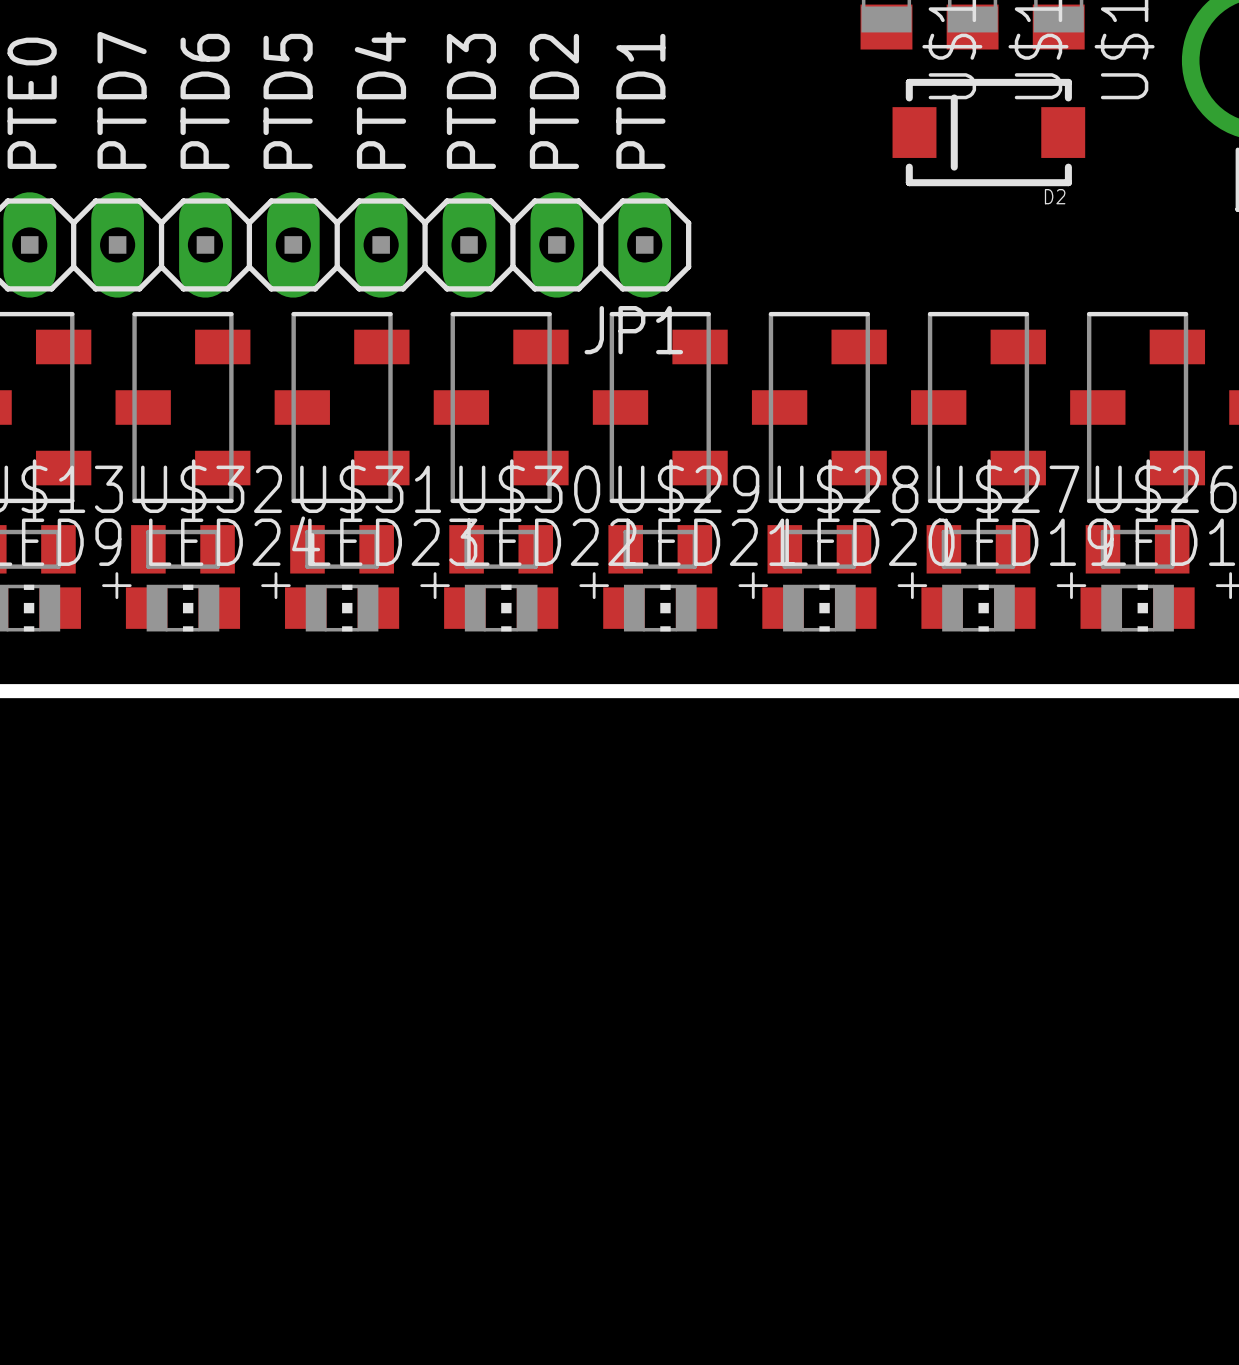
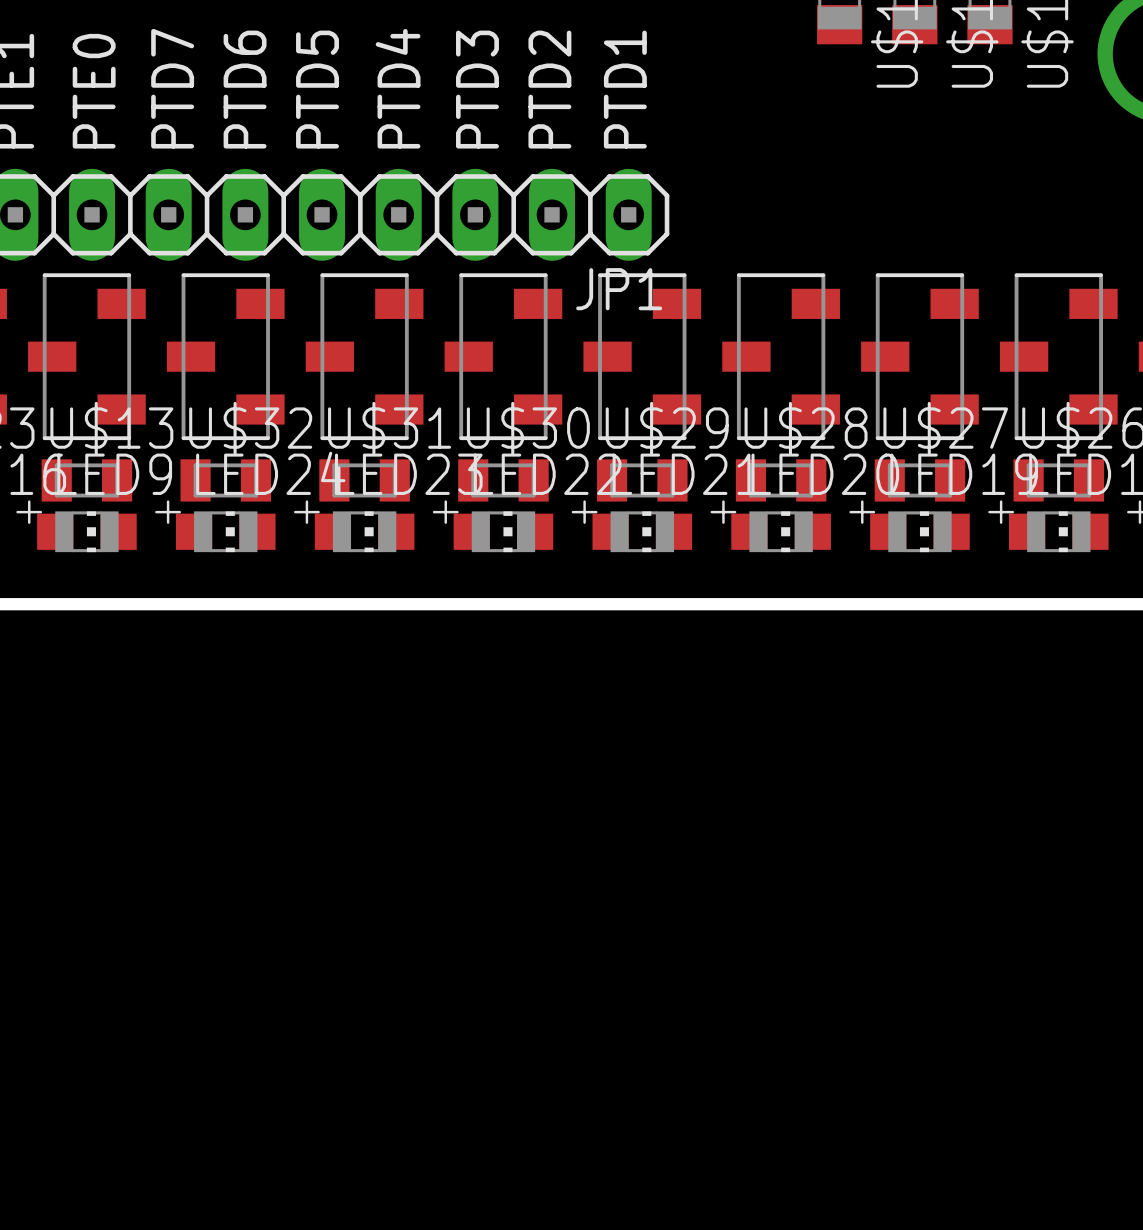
D2: (988, 132) -> none

